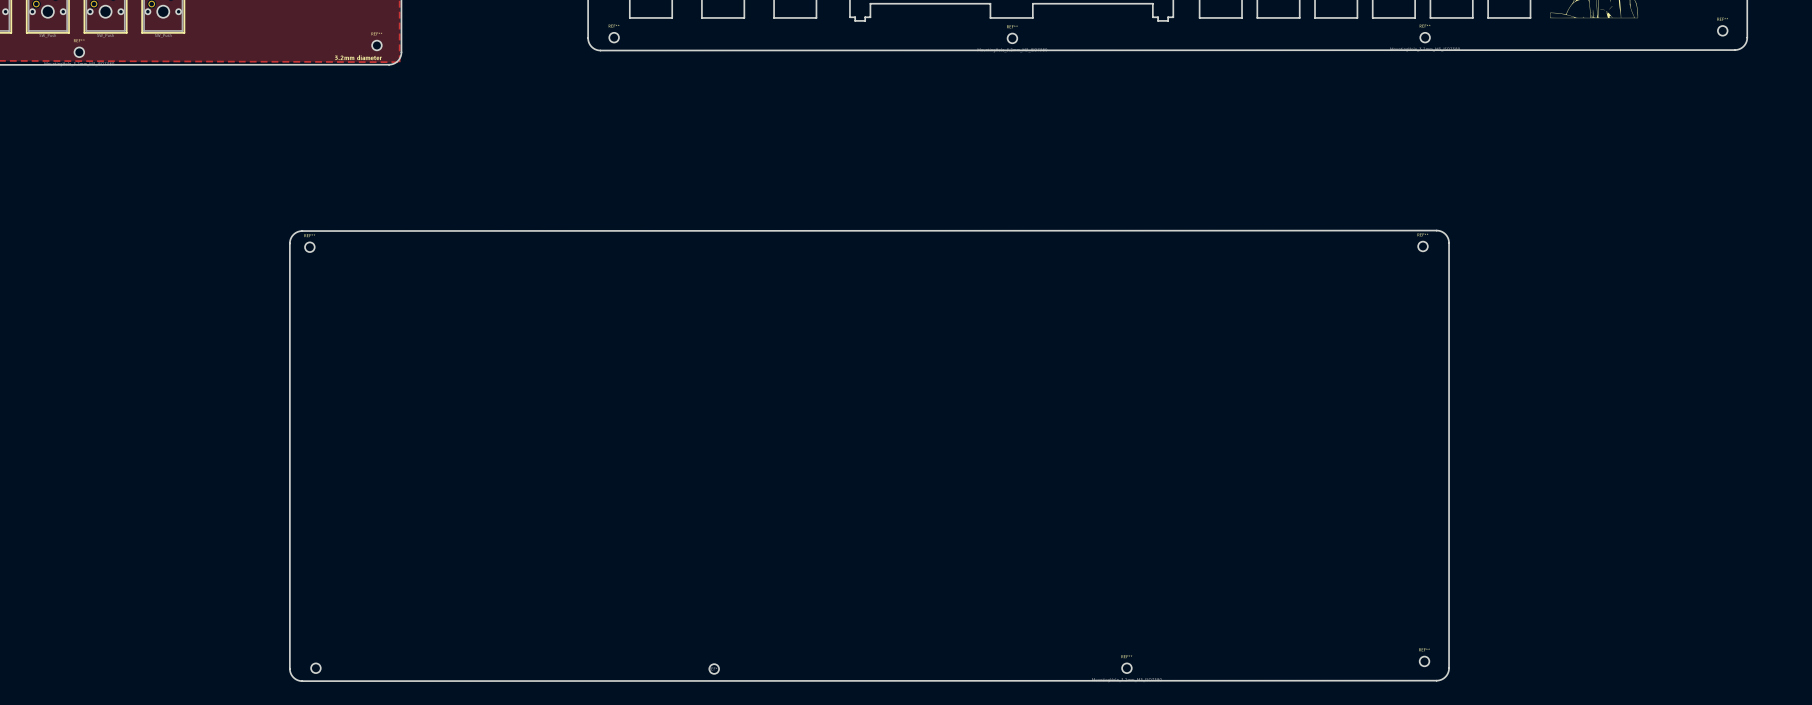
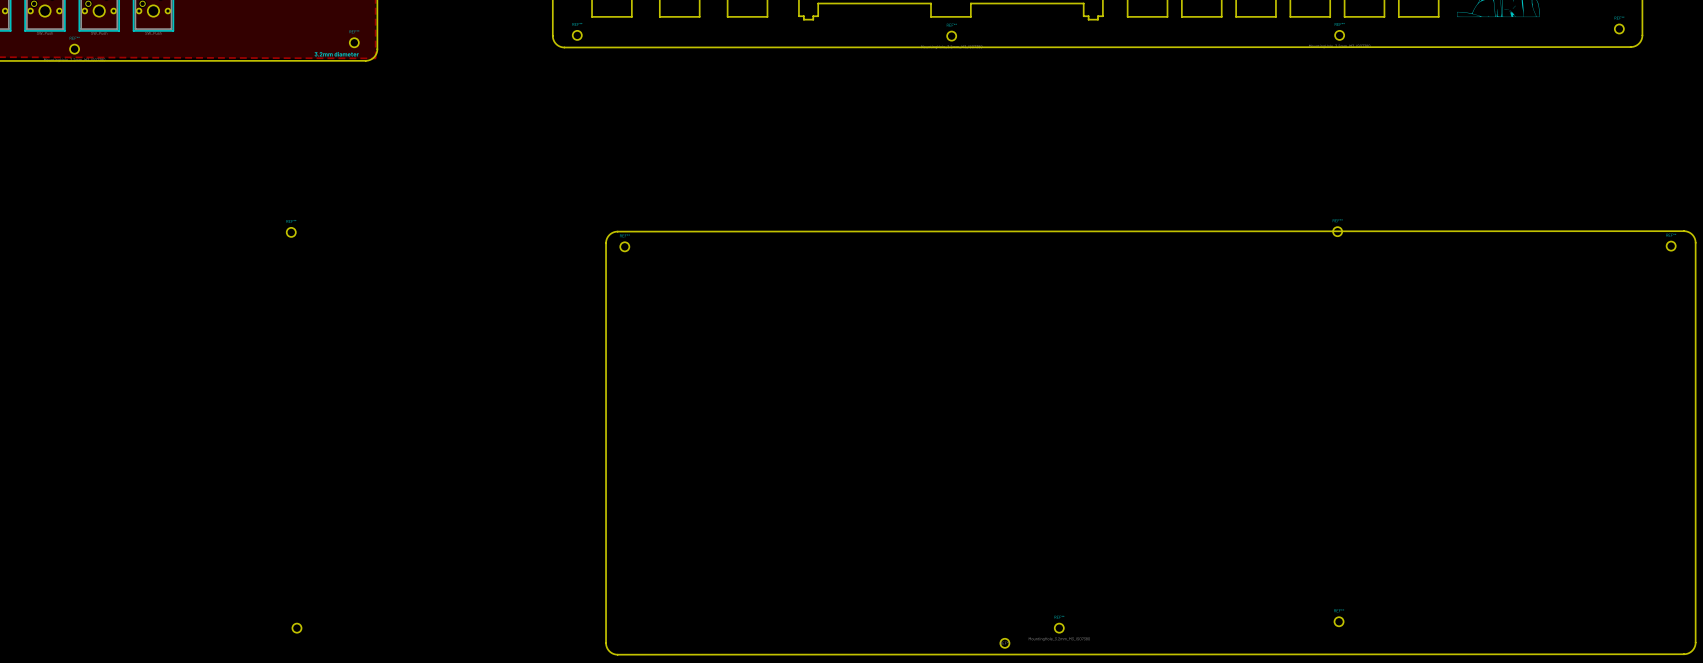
board edge: (1436, 230) (298, 231) (292, 235) (289, 243) (290, 672) (294, 678) (302, 681) (1440, 679) (1446, 675) (1449, 668) (1449, 242) (1445, 234) (1436, 230) -> (1683, 231) (613, 232) (608, 235) (606, 243) (606, 646) (611, 652) (617, 654) (1687, 653) (1693, 649) (1695, 642) (1695, 242) (1692, 234) (1683, 231)
part: none -> (1671, 246)
part: none -> (624, 246)
part: (714, 669) -> none
part: none -> (1004, 643)

